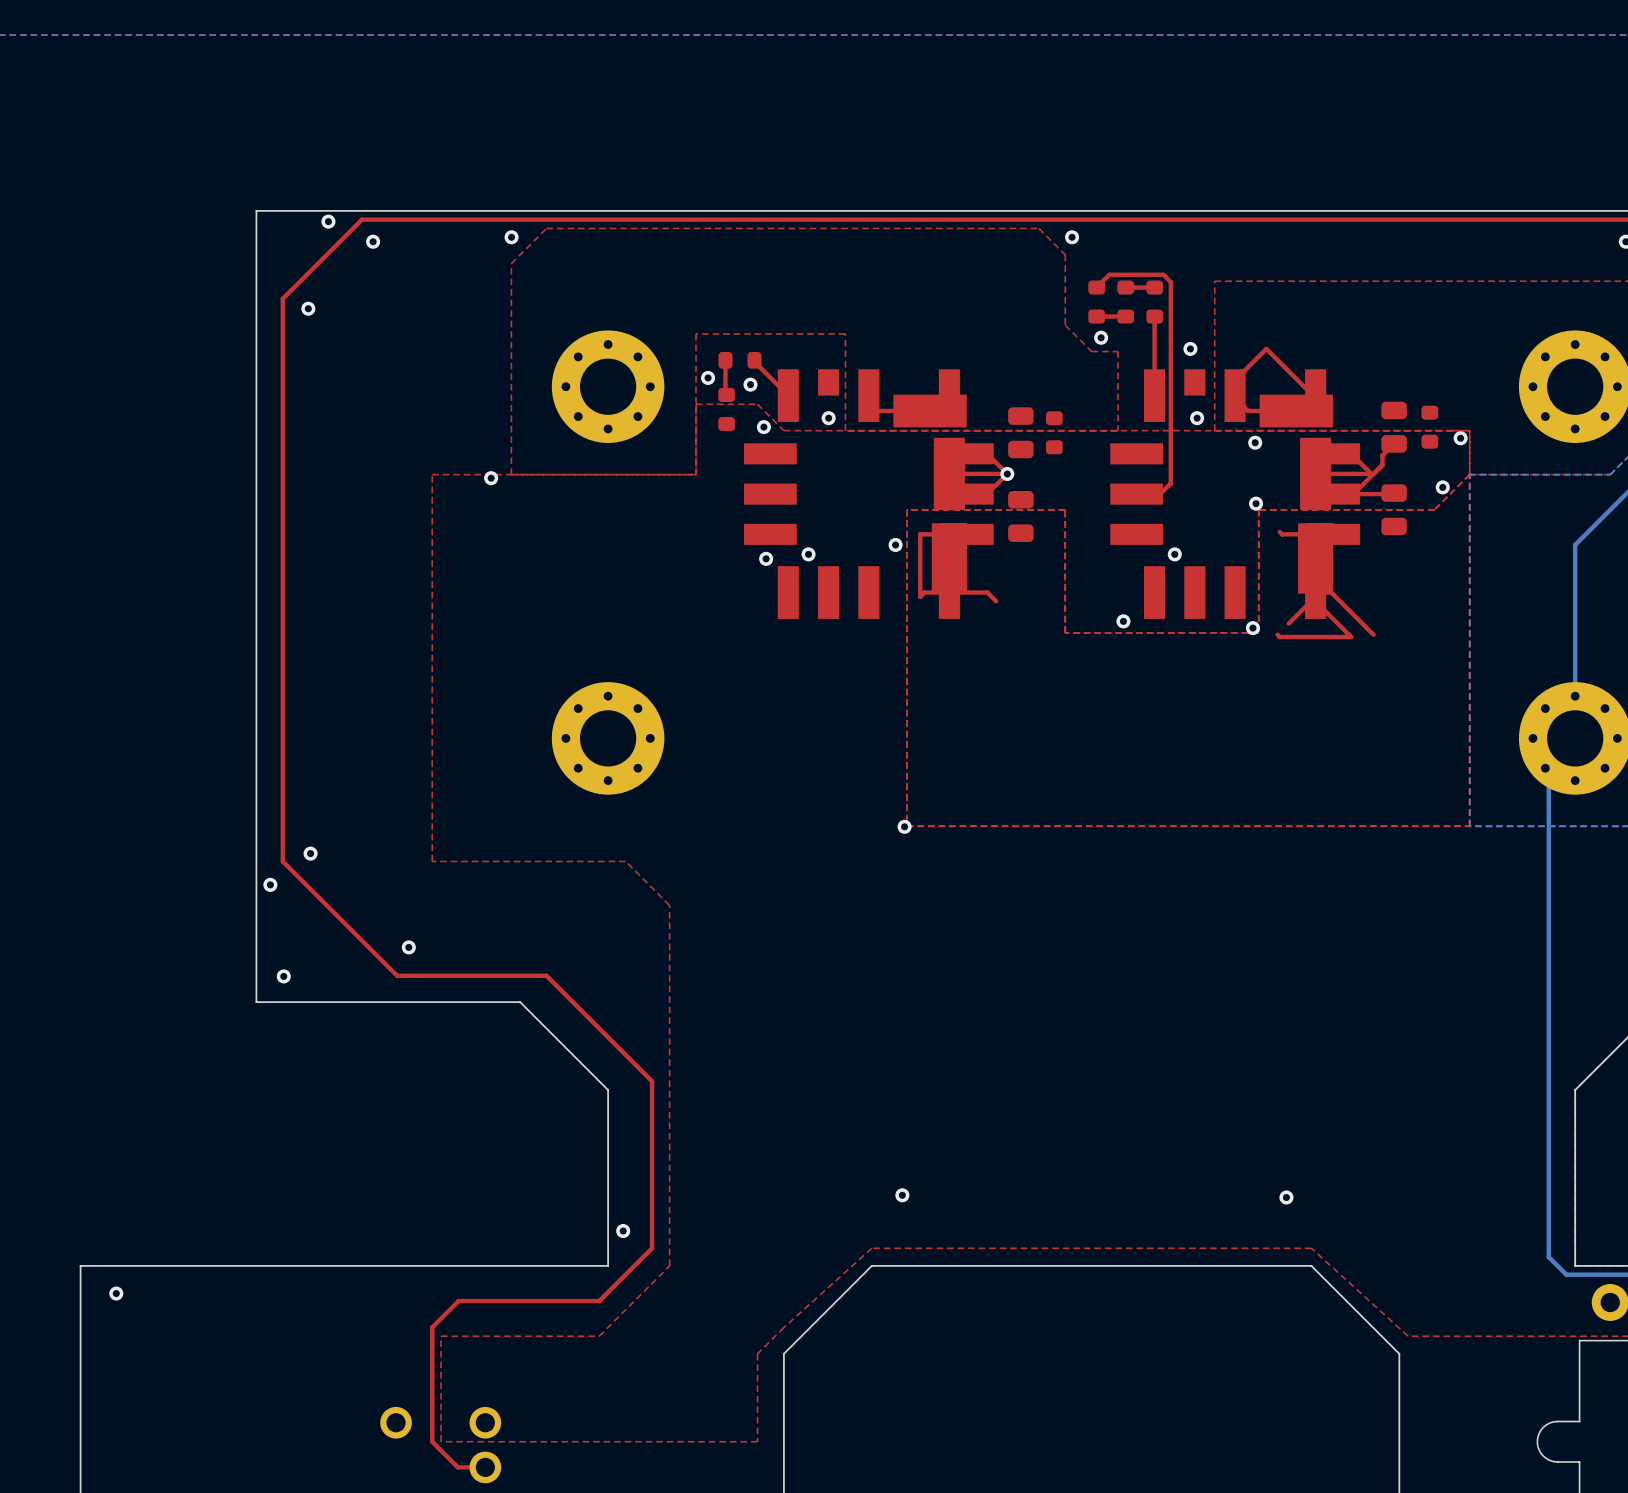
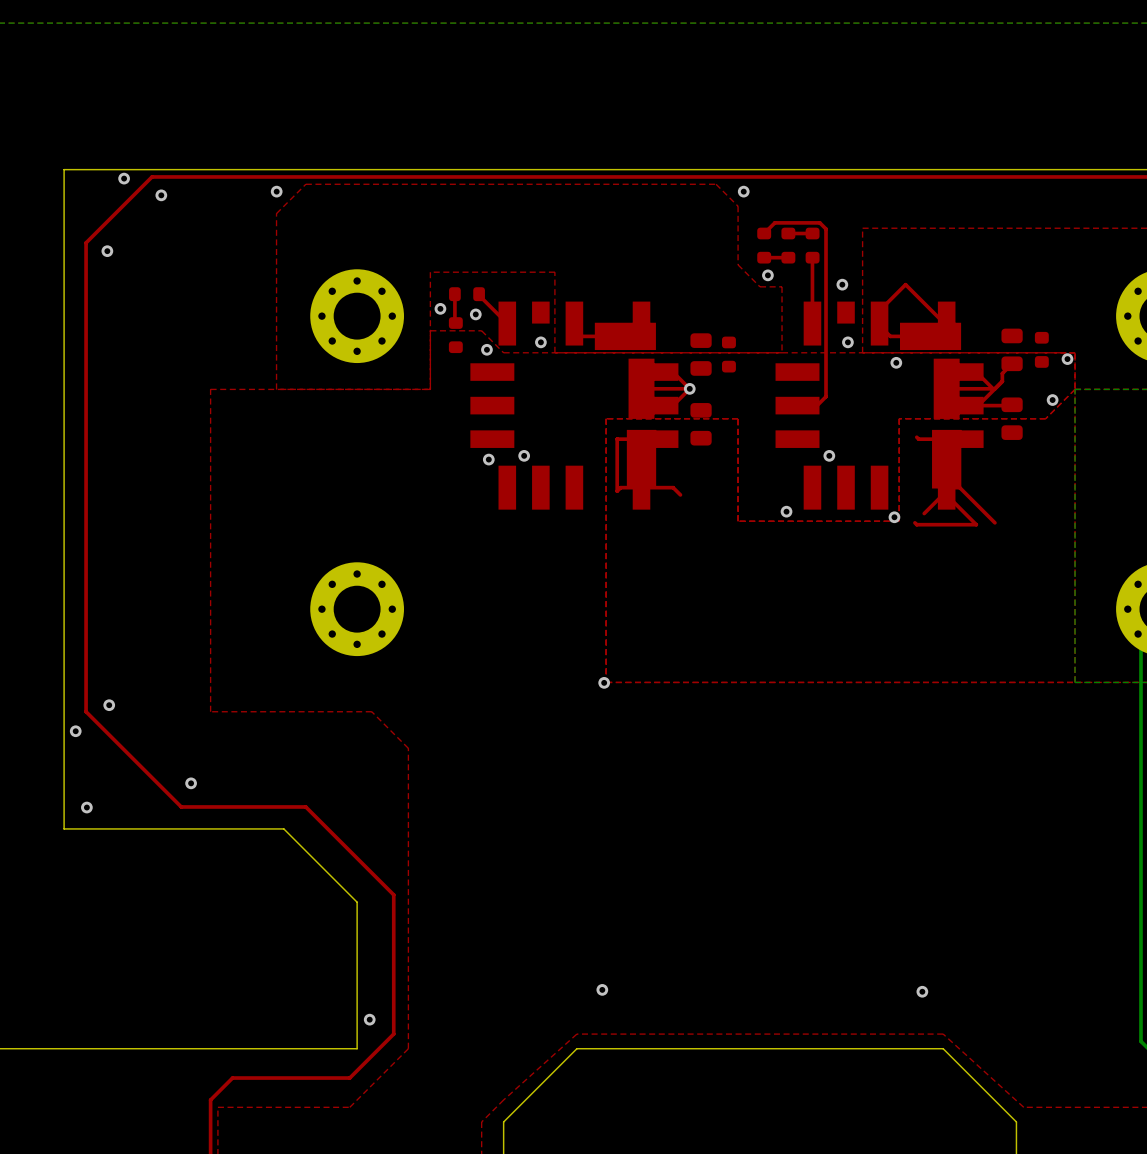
via: (491, 478) -> none
via: (1256, 503) -> none
via: (895, 544) -> none

